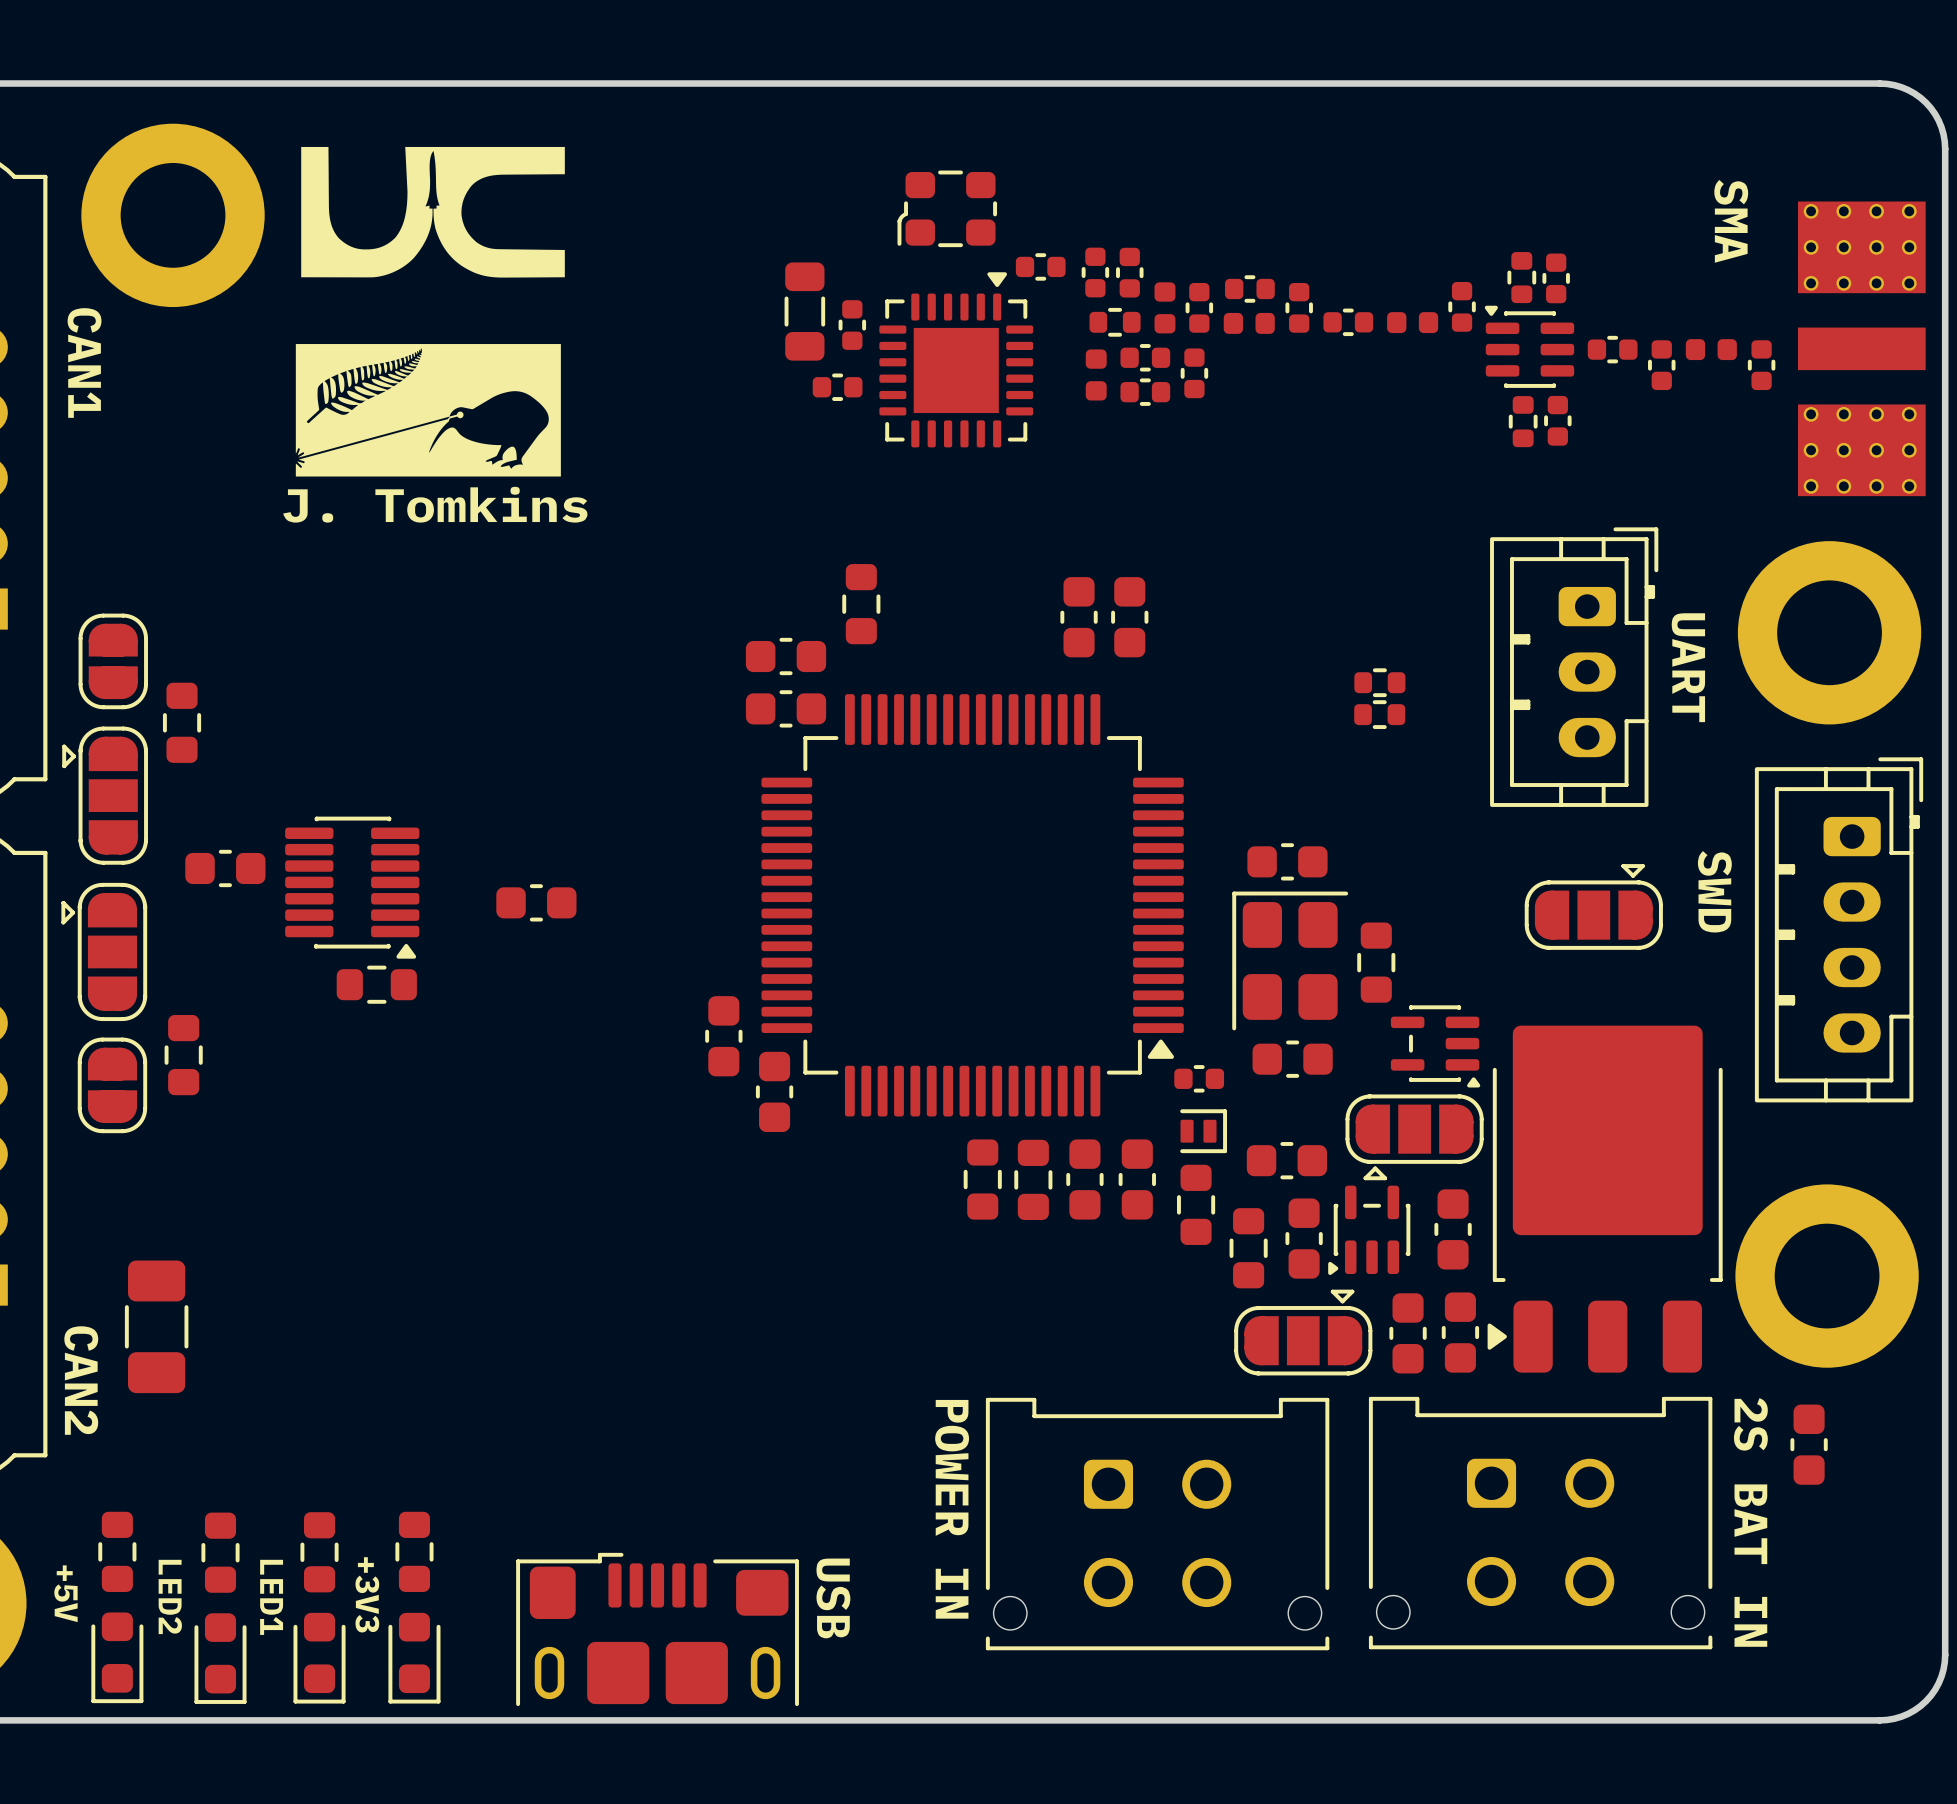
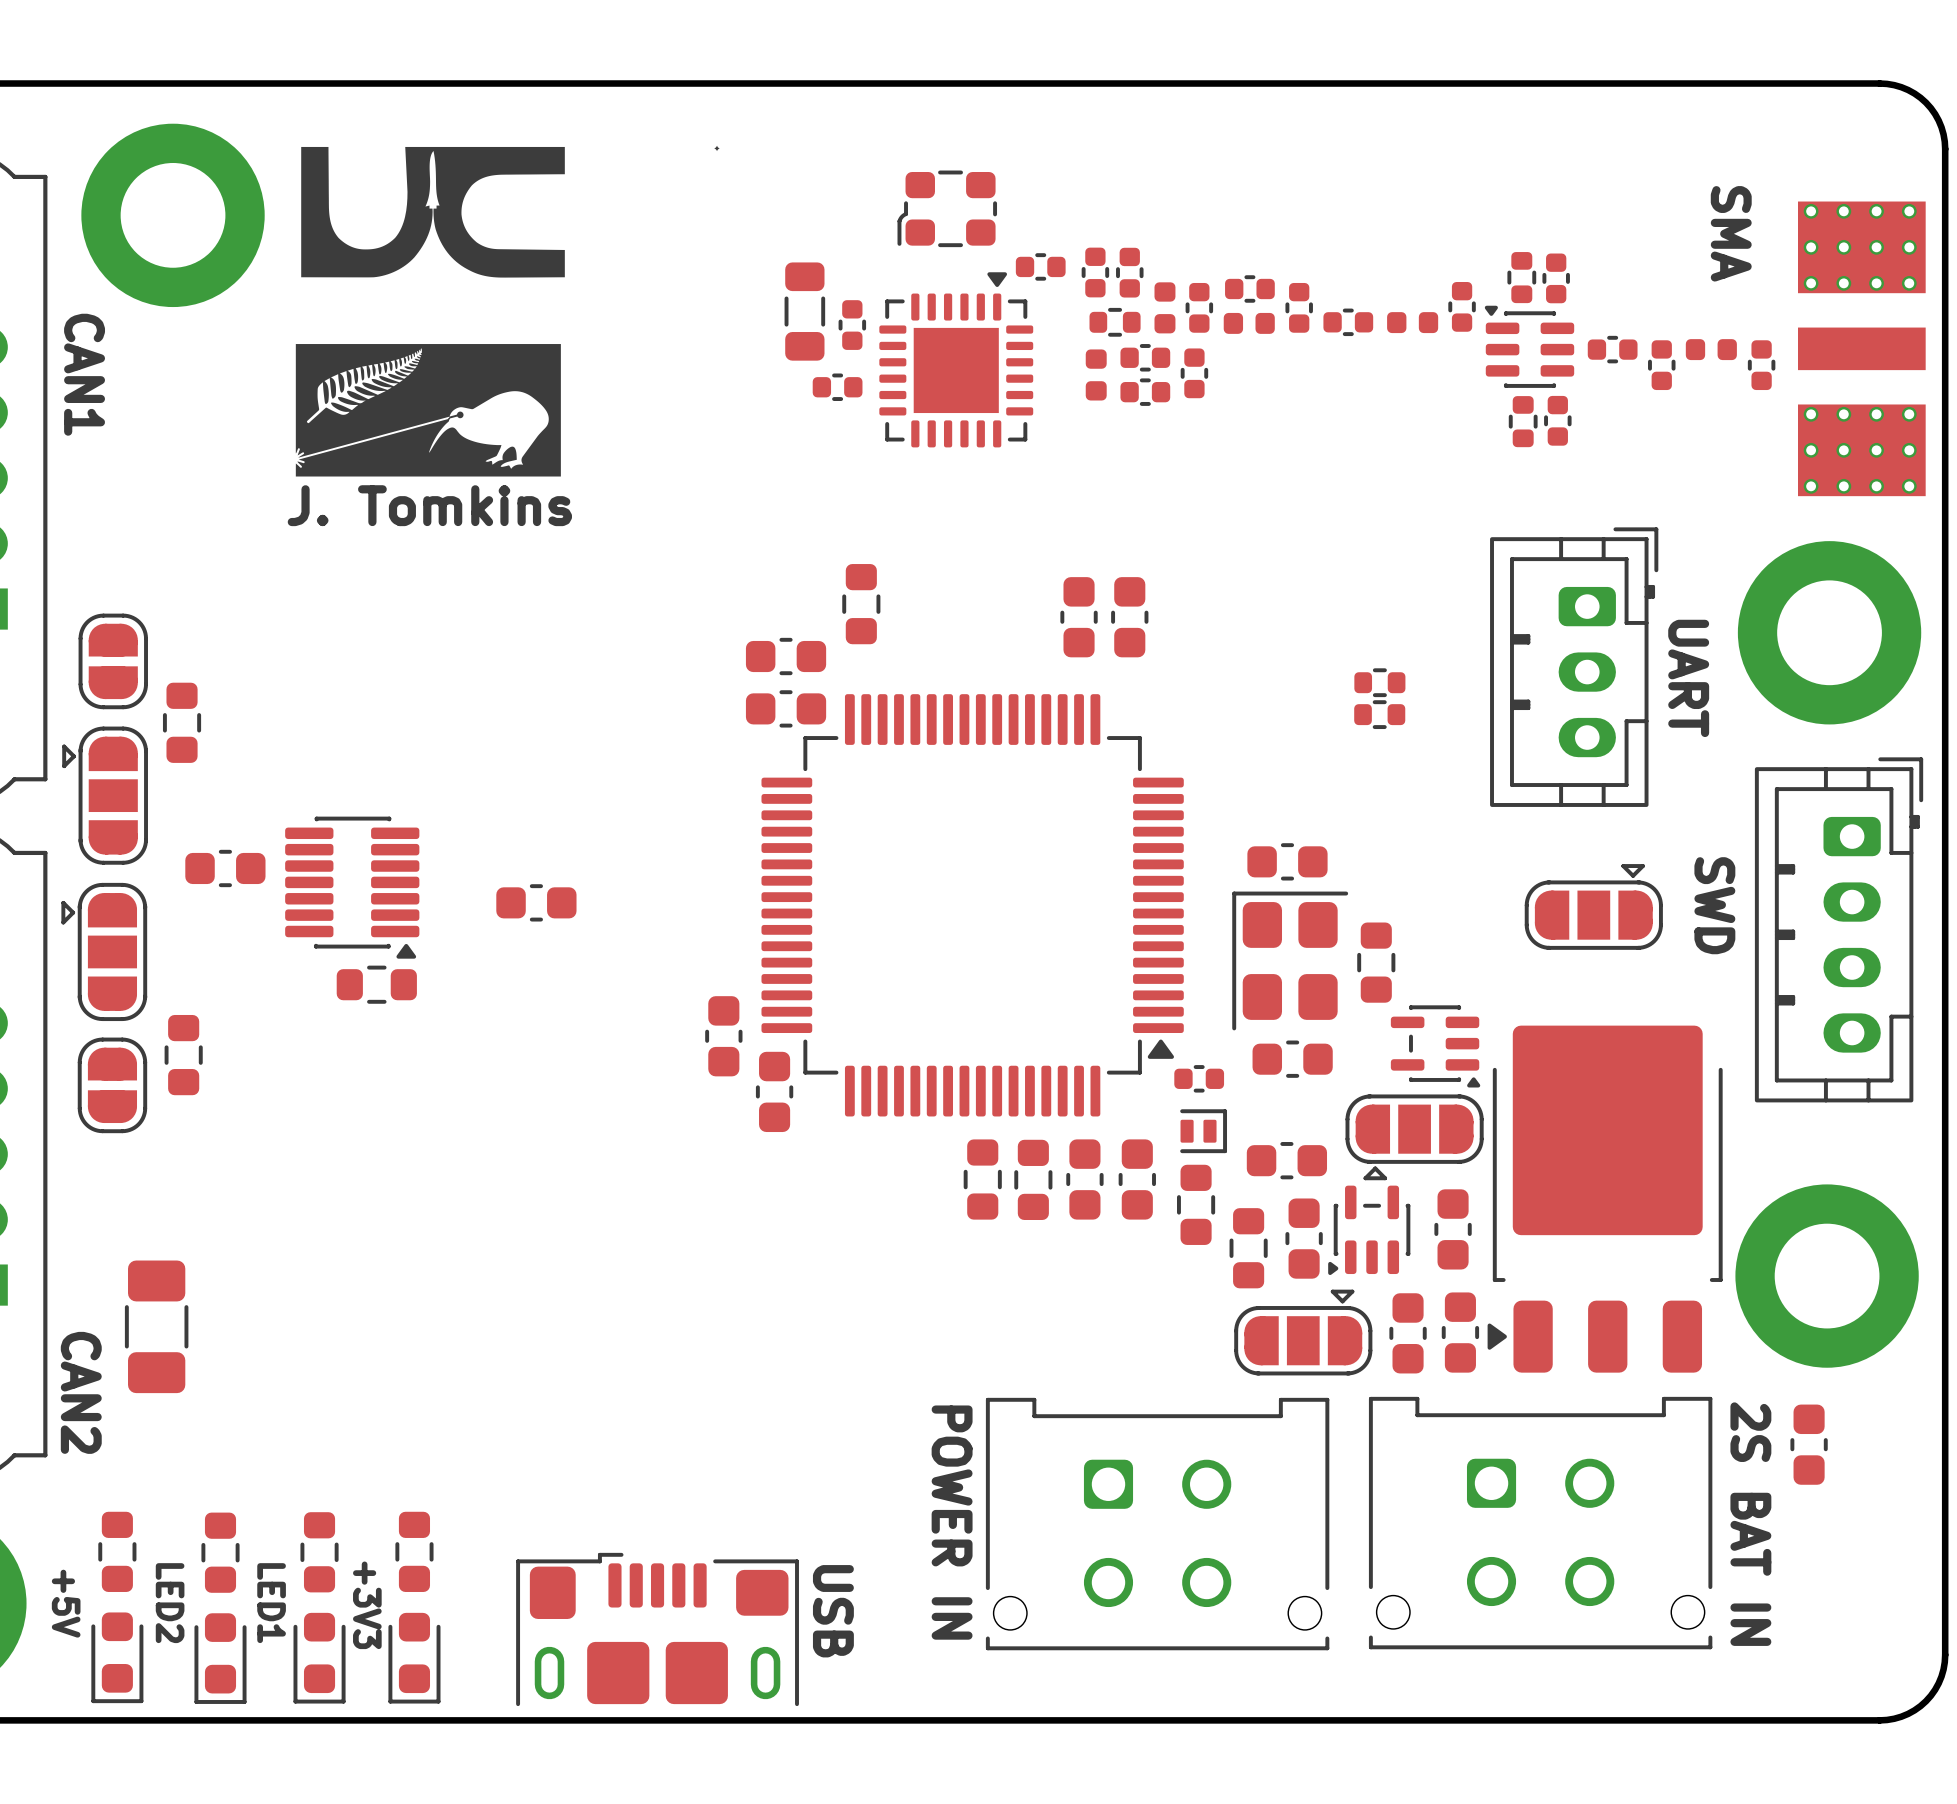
drawing: none -> [714, 145, 720, 152]

